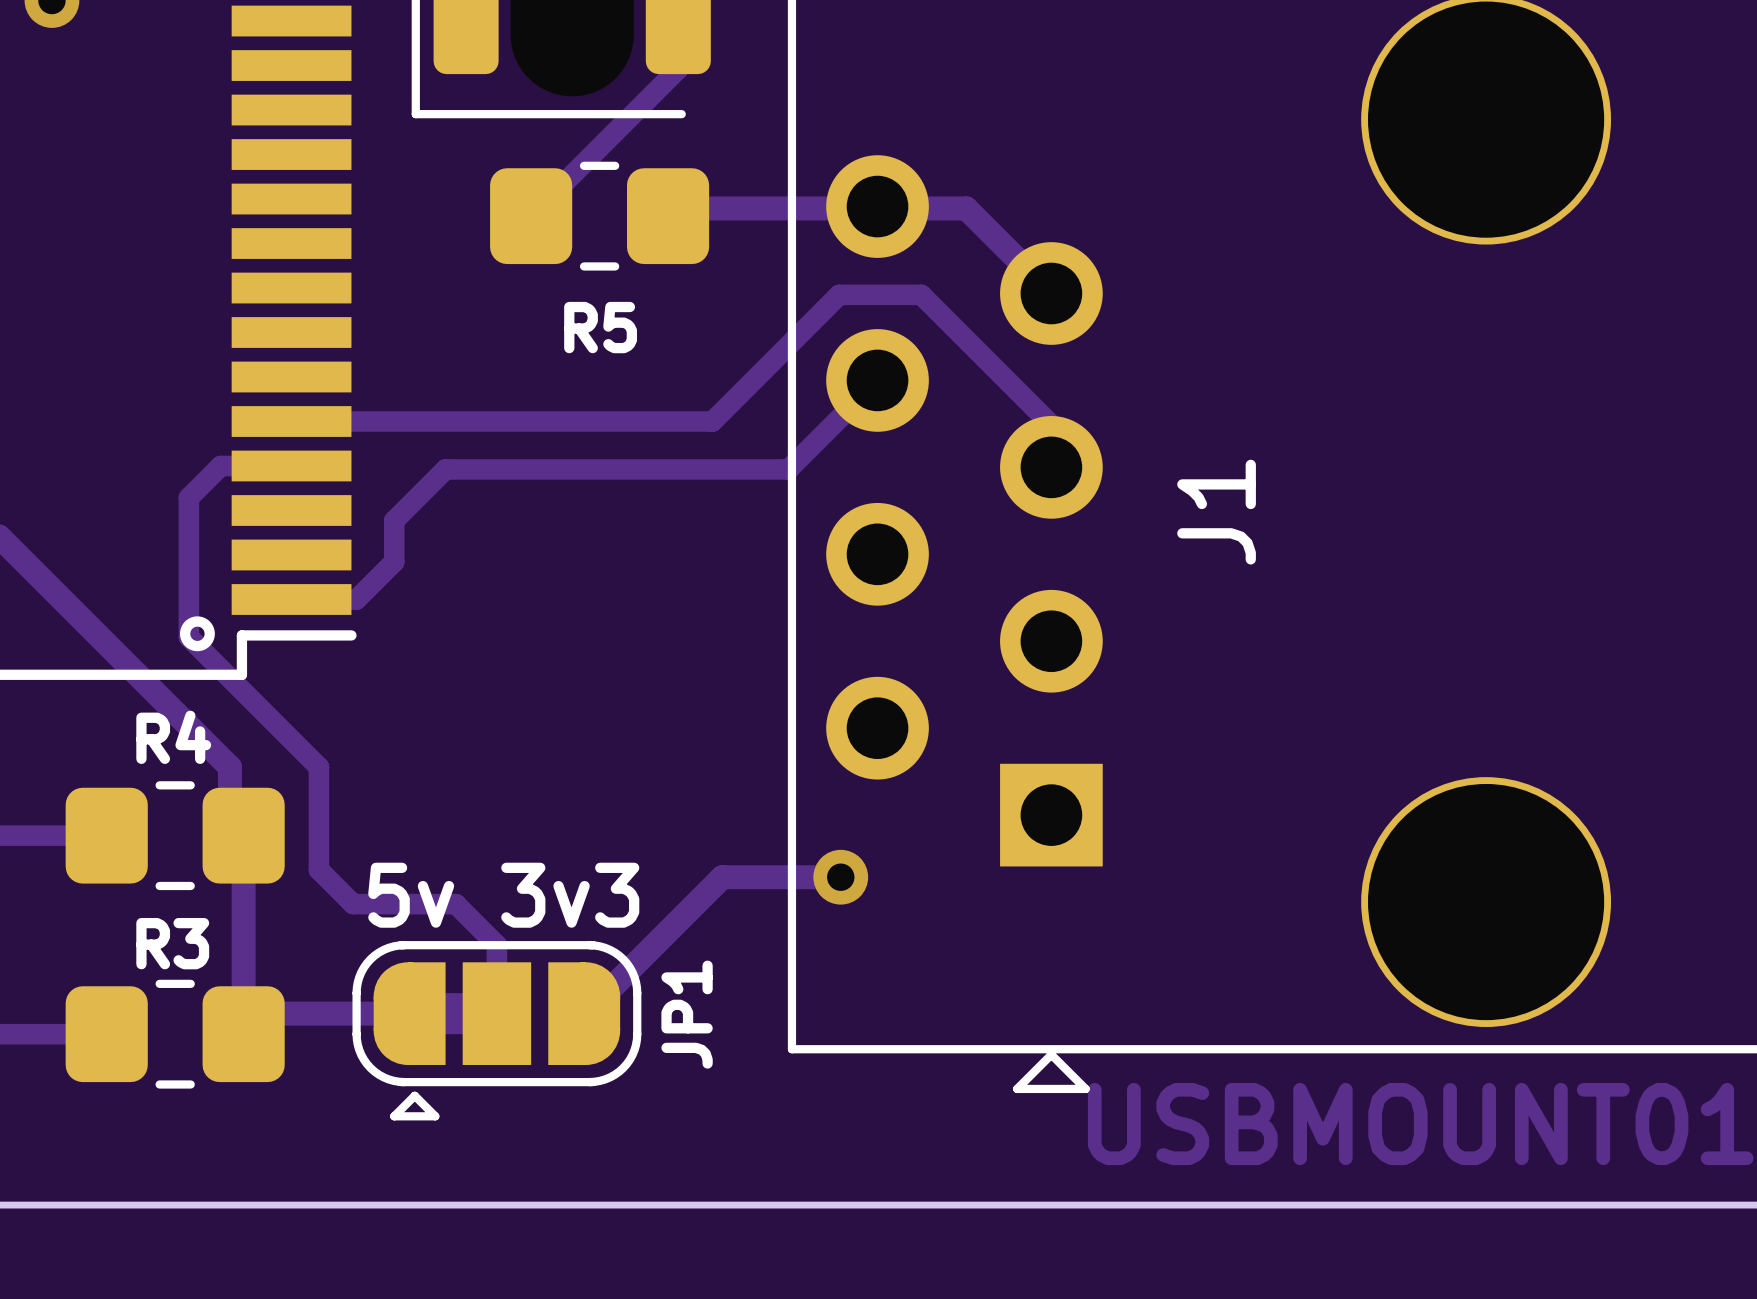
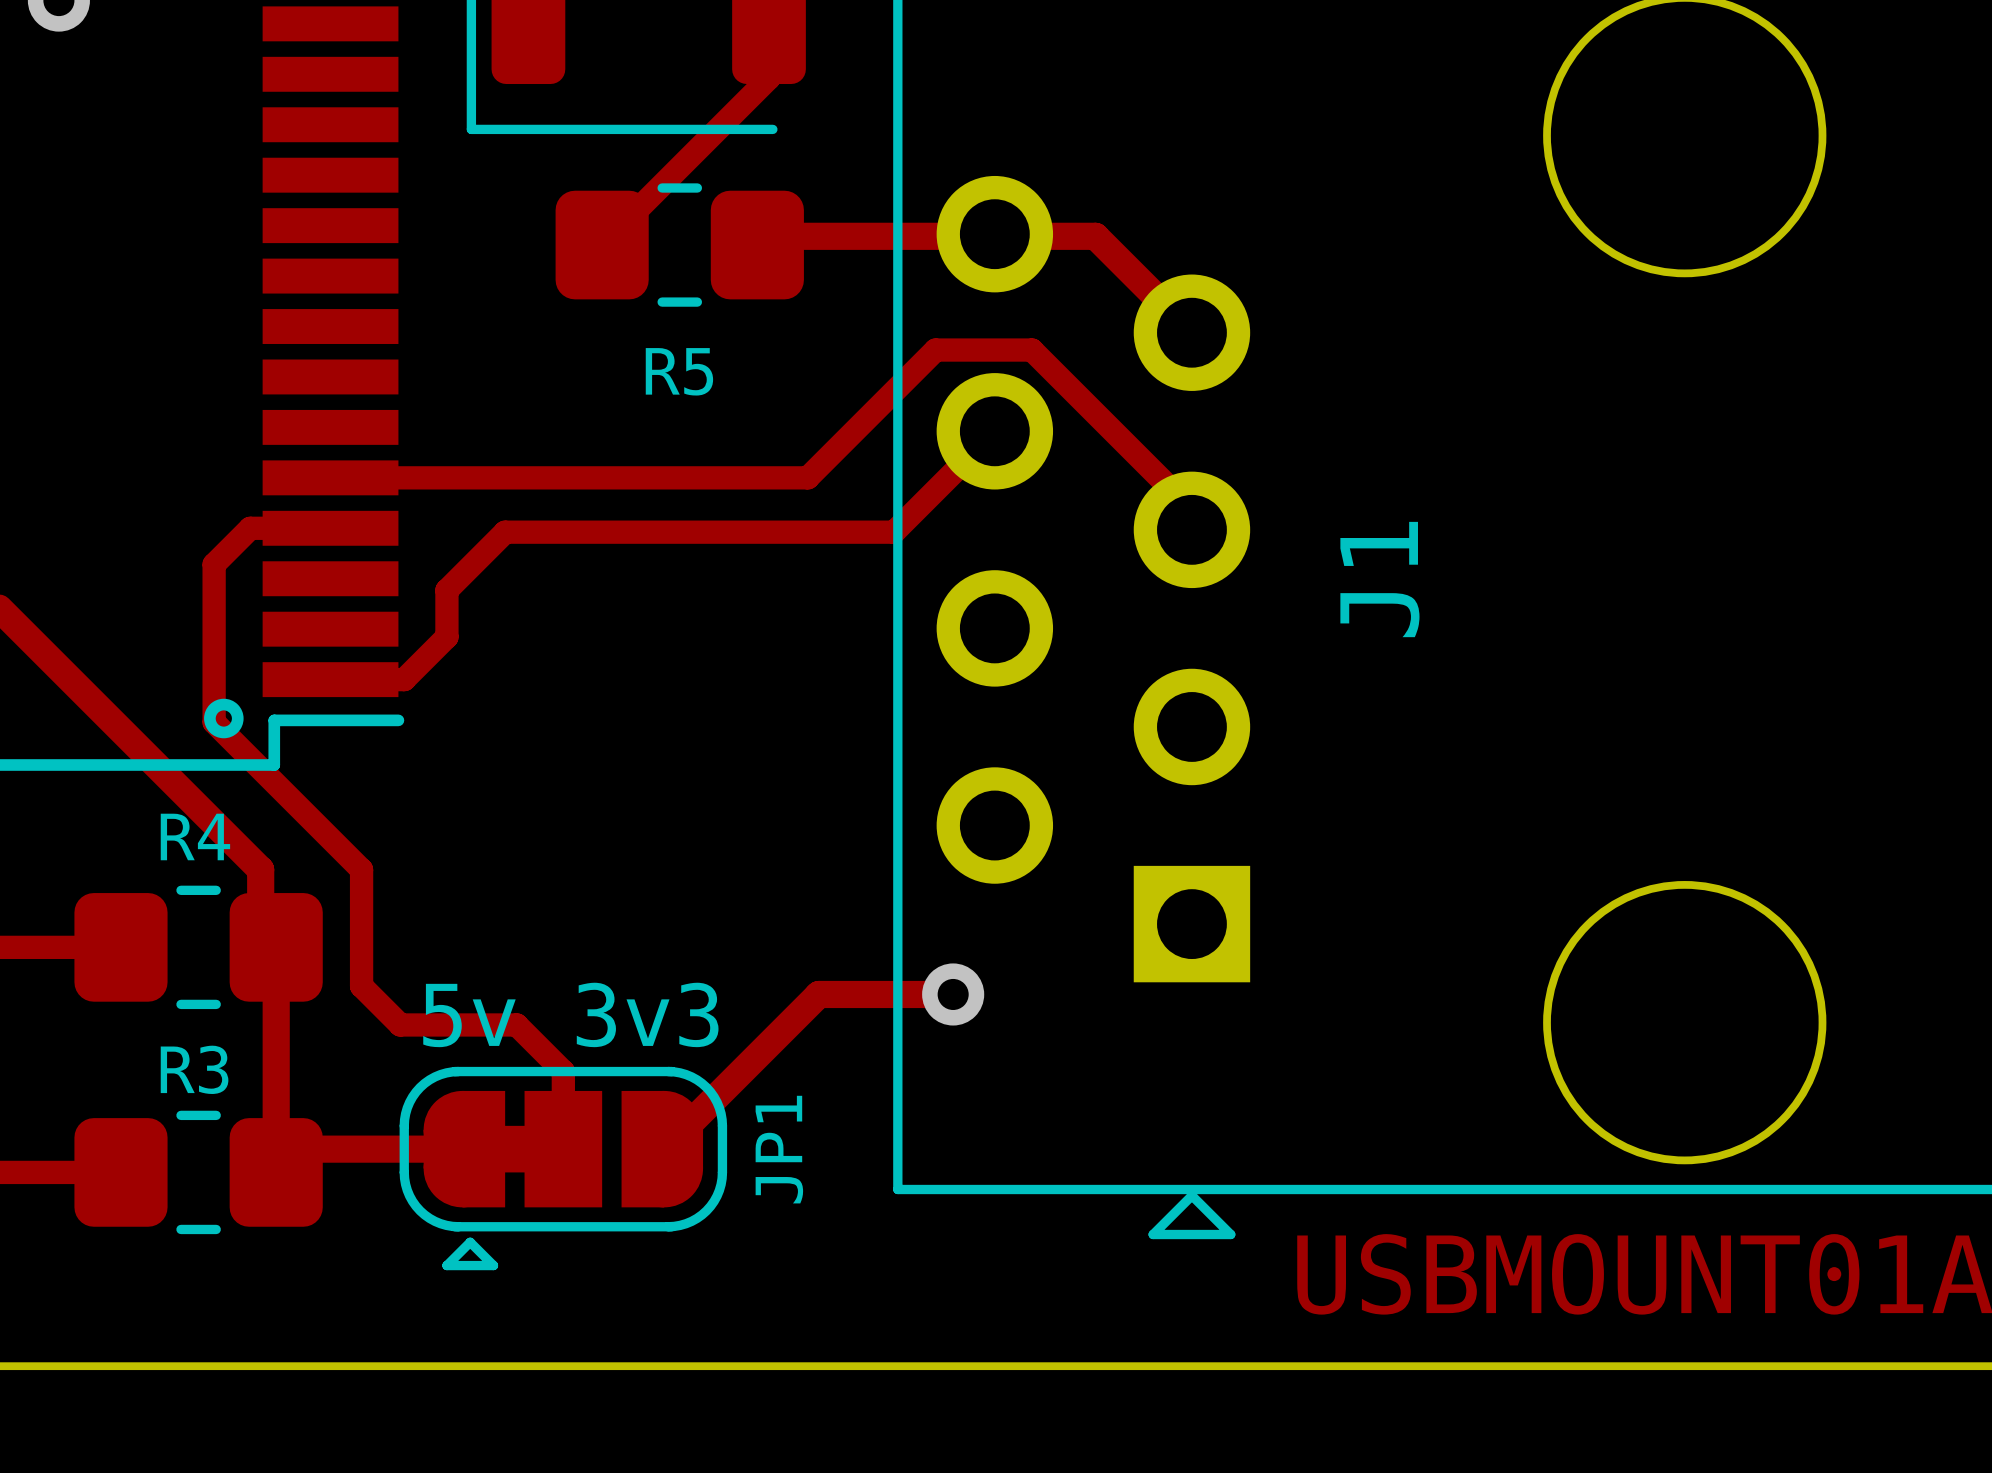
track: (825, 308) (839, 294) (921, 294) (1051, 424) (1051, 467) -> (935, 350) (1031, 350) (1189, 507) (1189, 531)

